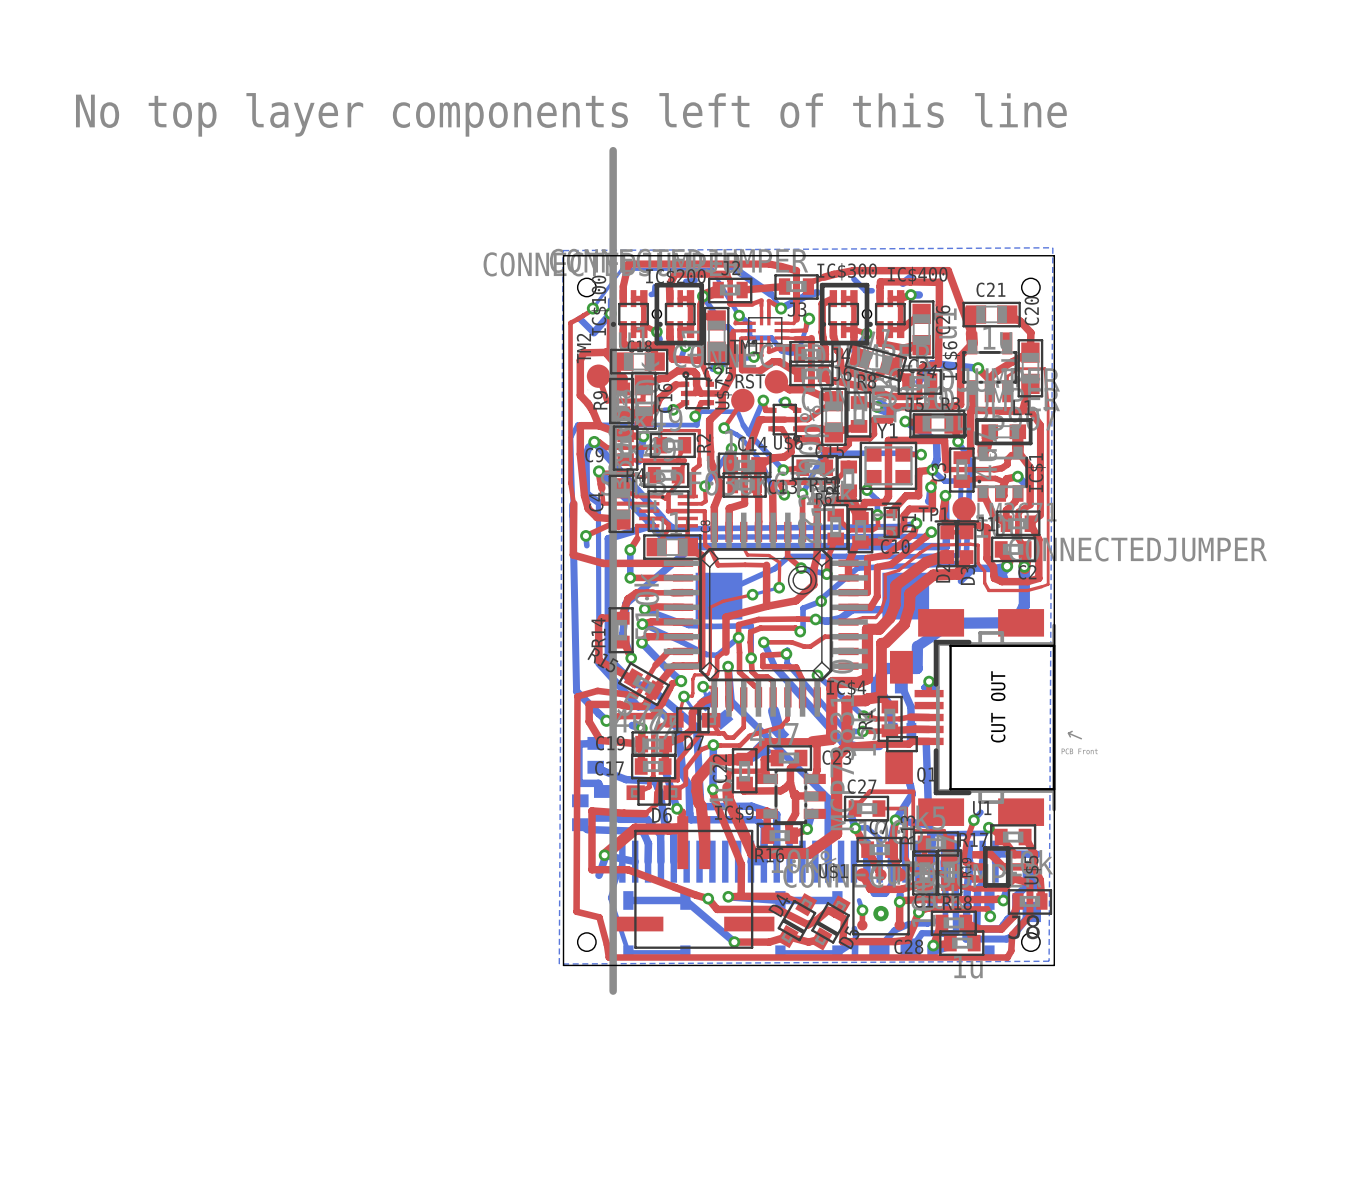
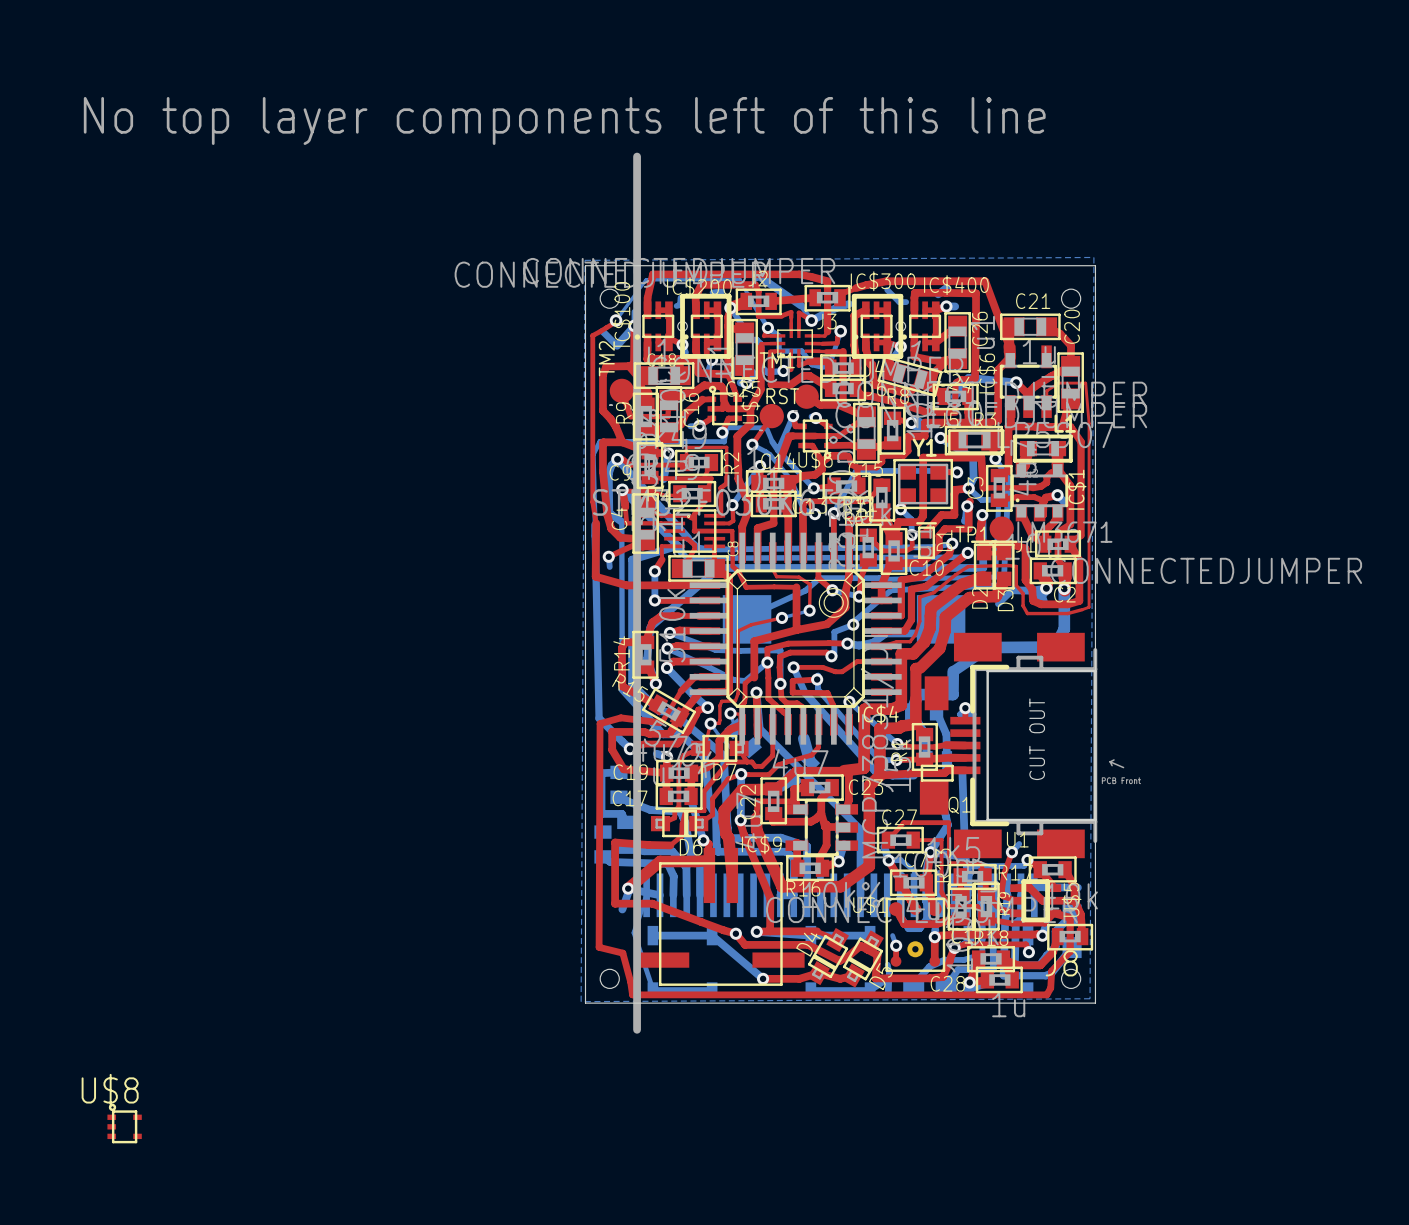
U$8: none -> (124, 1123)

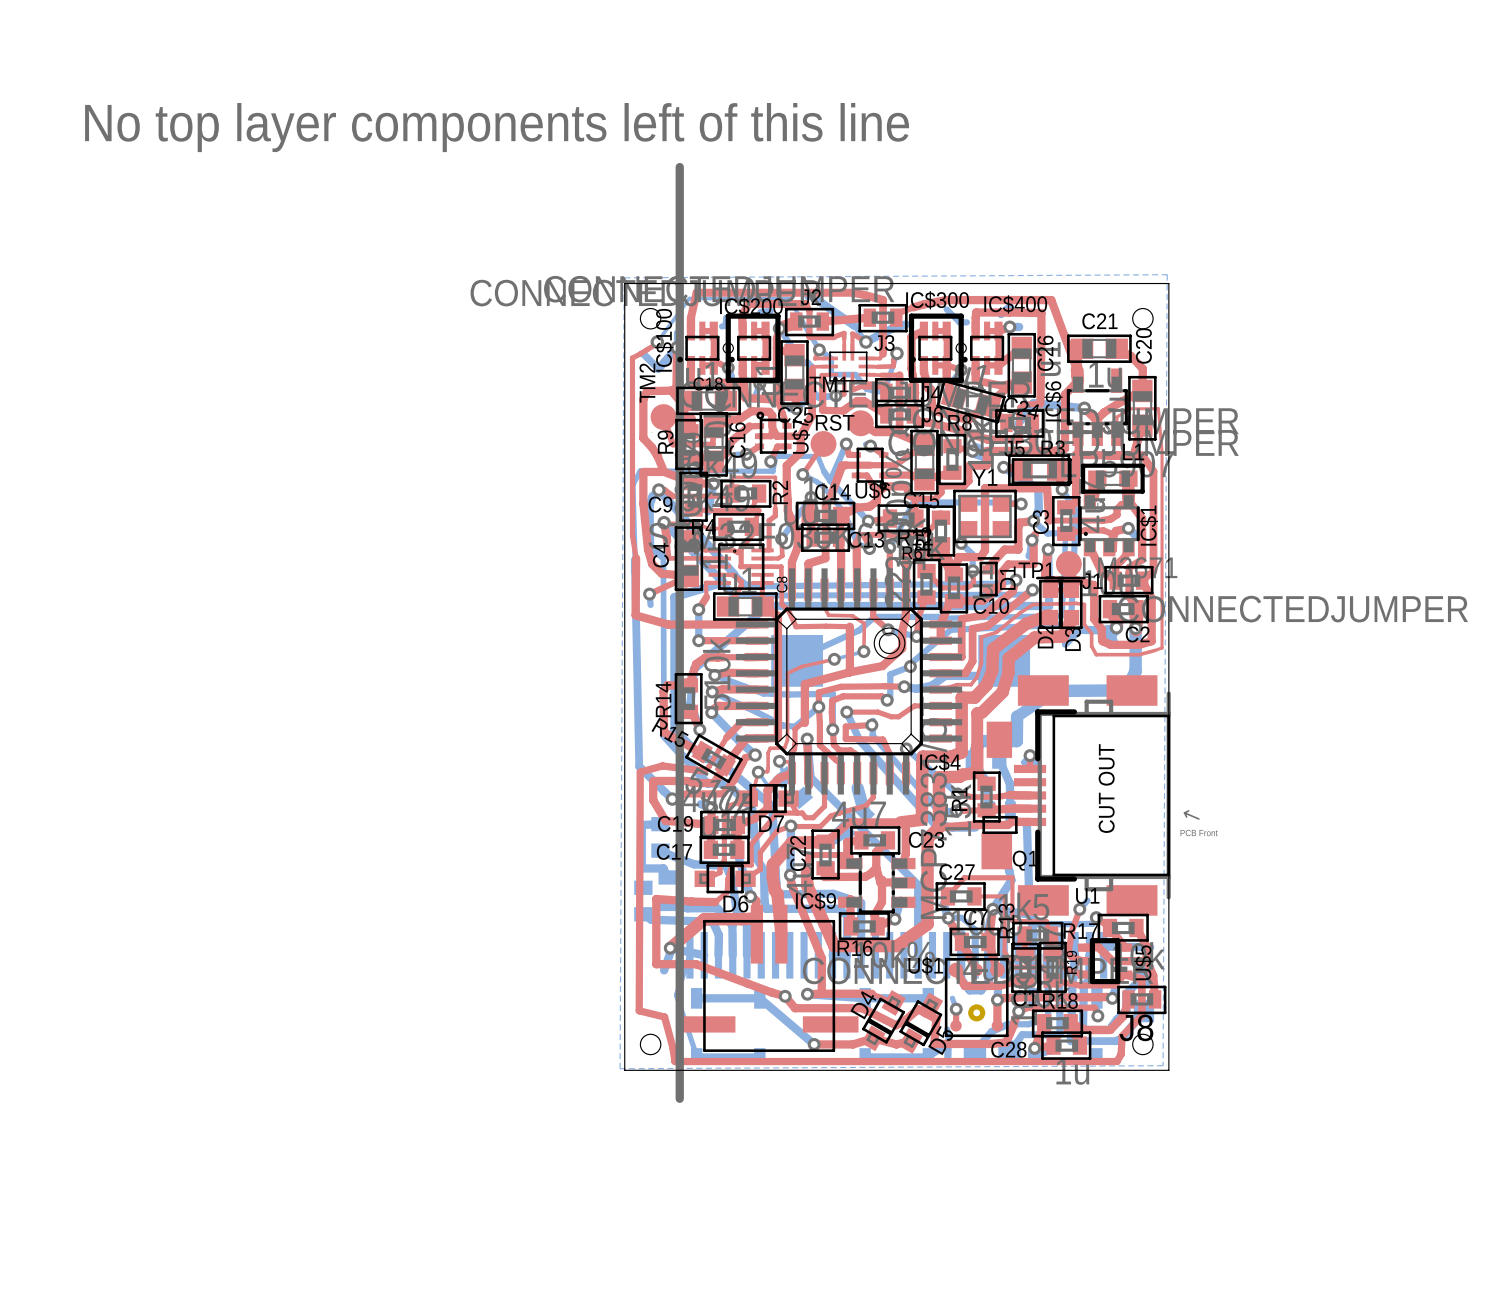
U$8: (124, 1123) -> none

